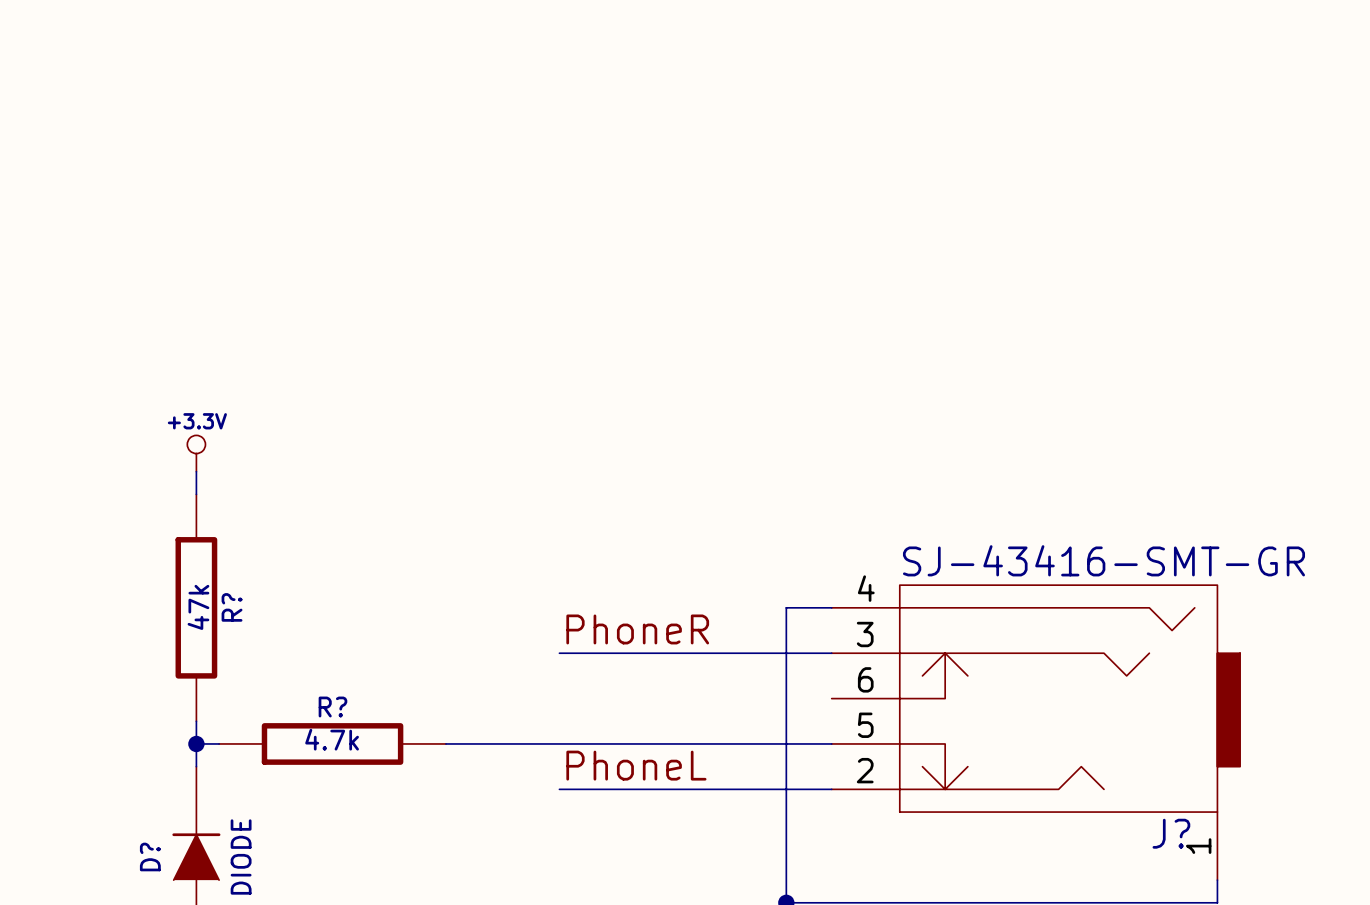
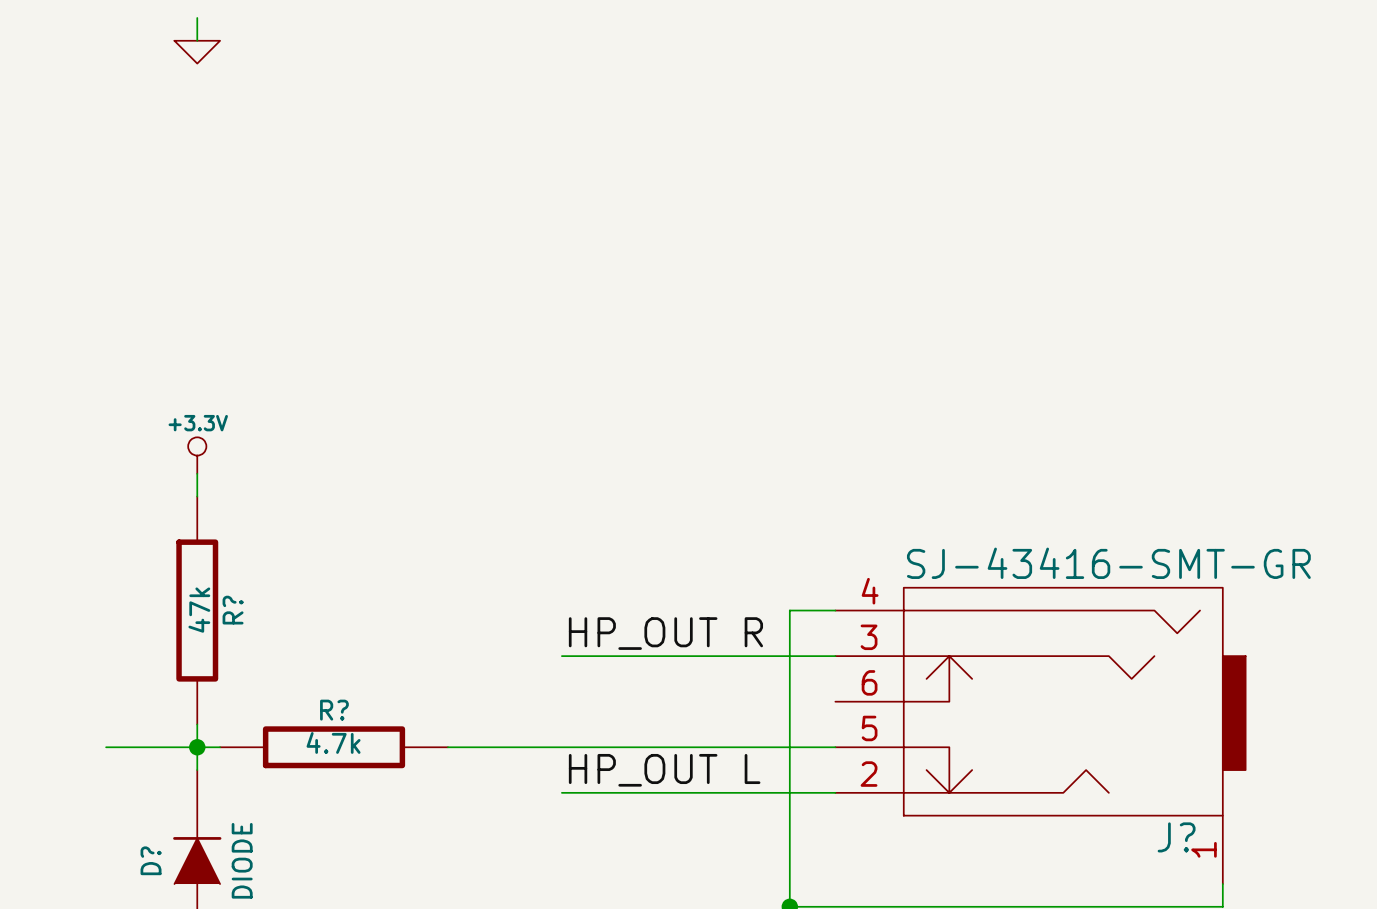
wire: none -> (197, 17) (197, 40)
power symbol: none -> (197, 52)
label: PhoneR (637, 629) -> HP_OUT R (665, 633)
wire: none -> (106, 747) (197, 747)
label: PhoneL (636, 765) -> HP_OUT L (664, 770)

